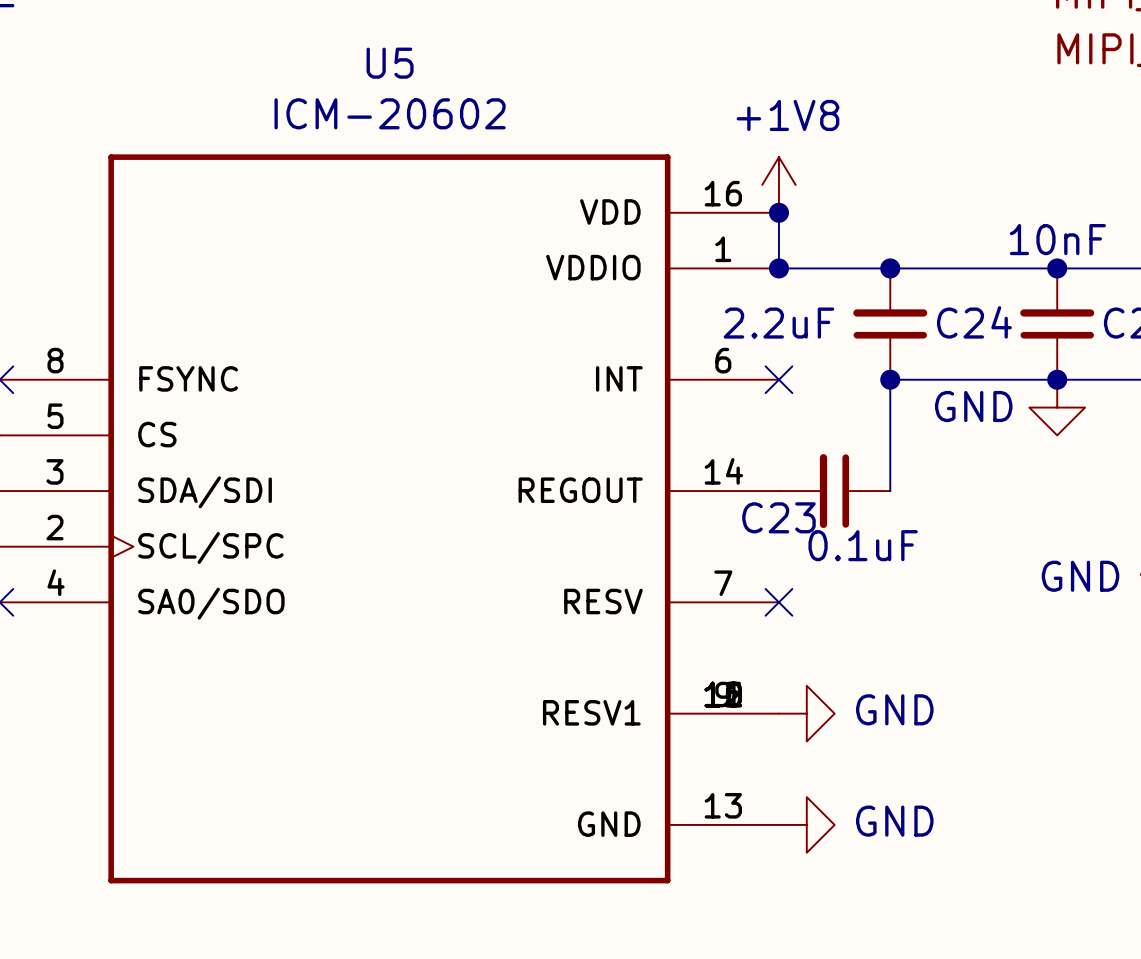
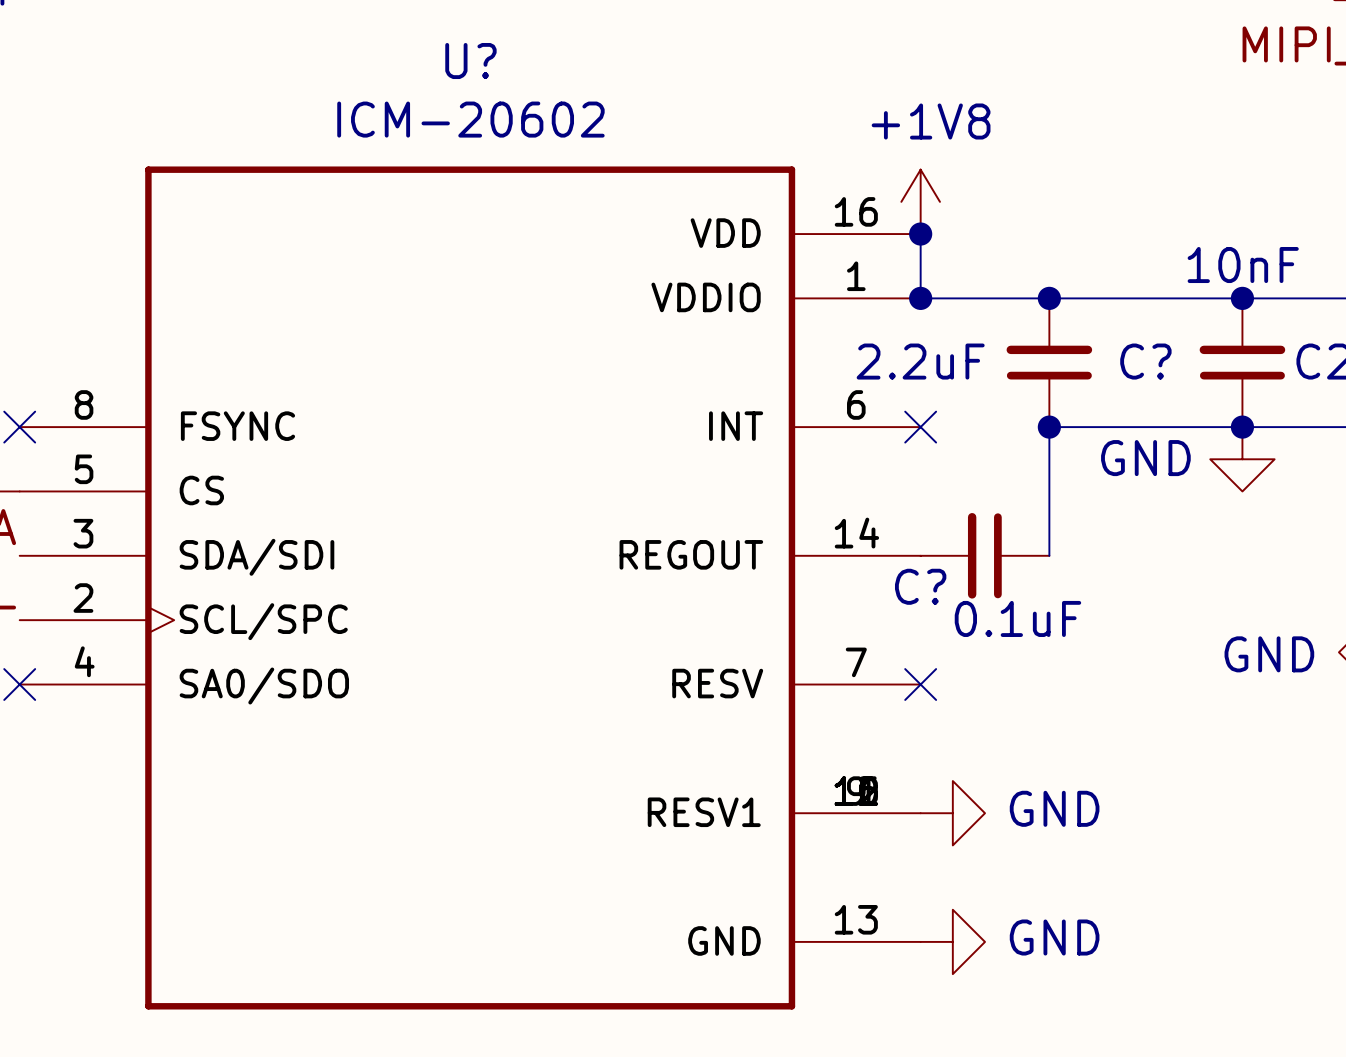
U5 name: U5 (390, 63) -> U? (470, 61)
C24 name: C24 (974, 322) -> C? (1145, 361)
C23 name: C23 (778, 517) -> C? (920, 586)

